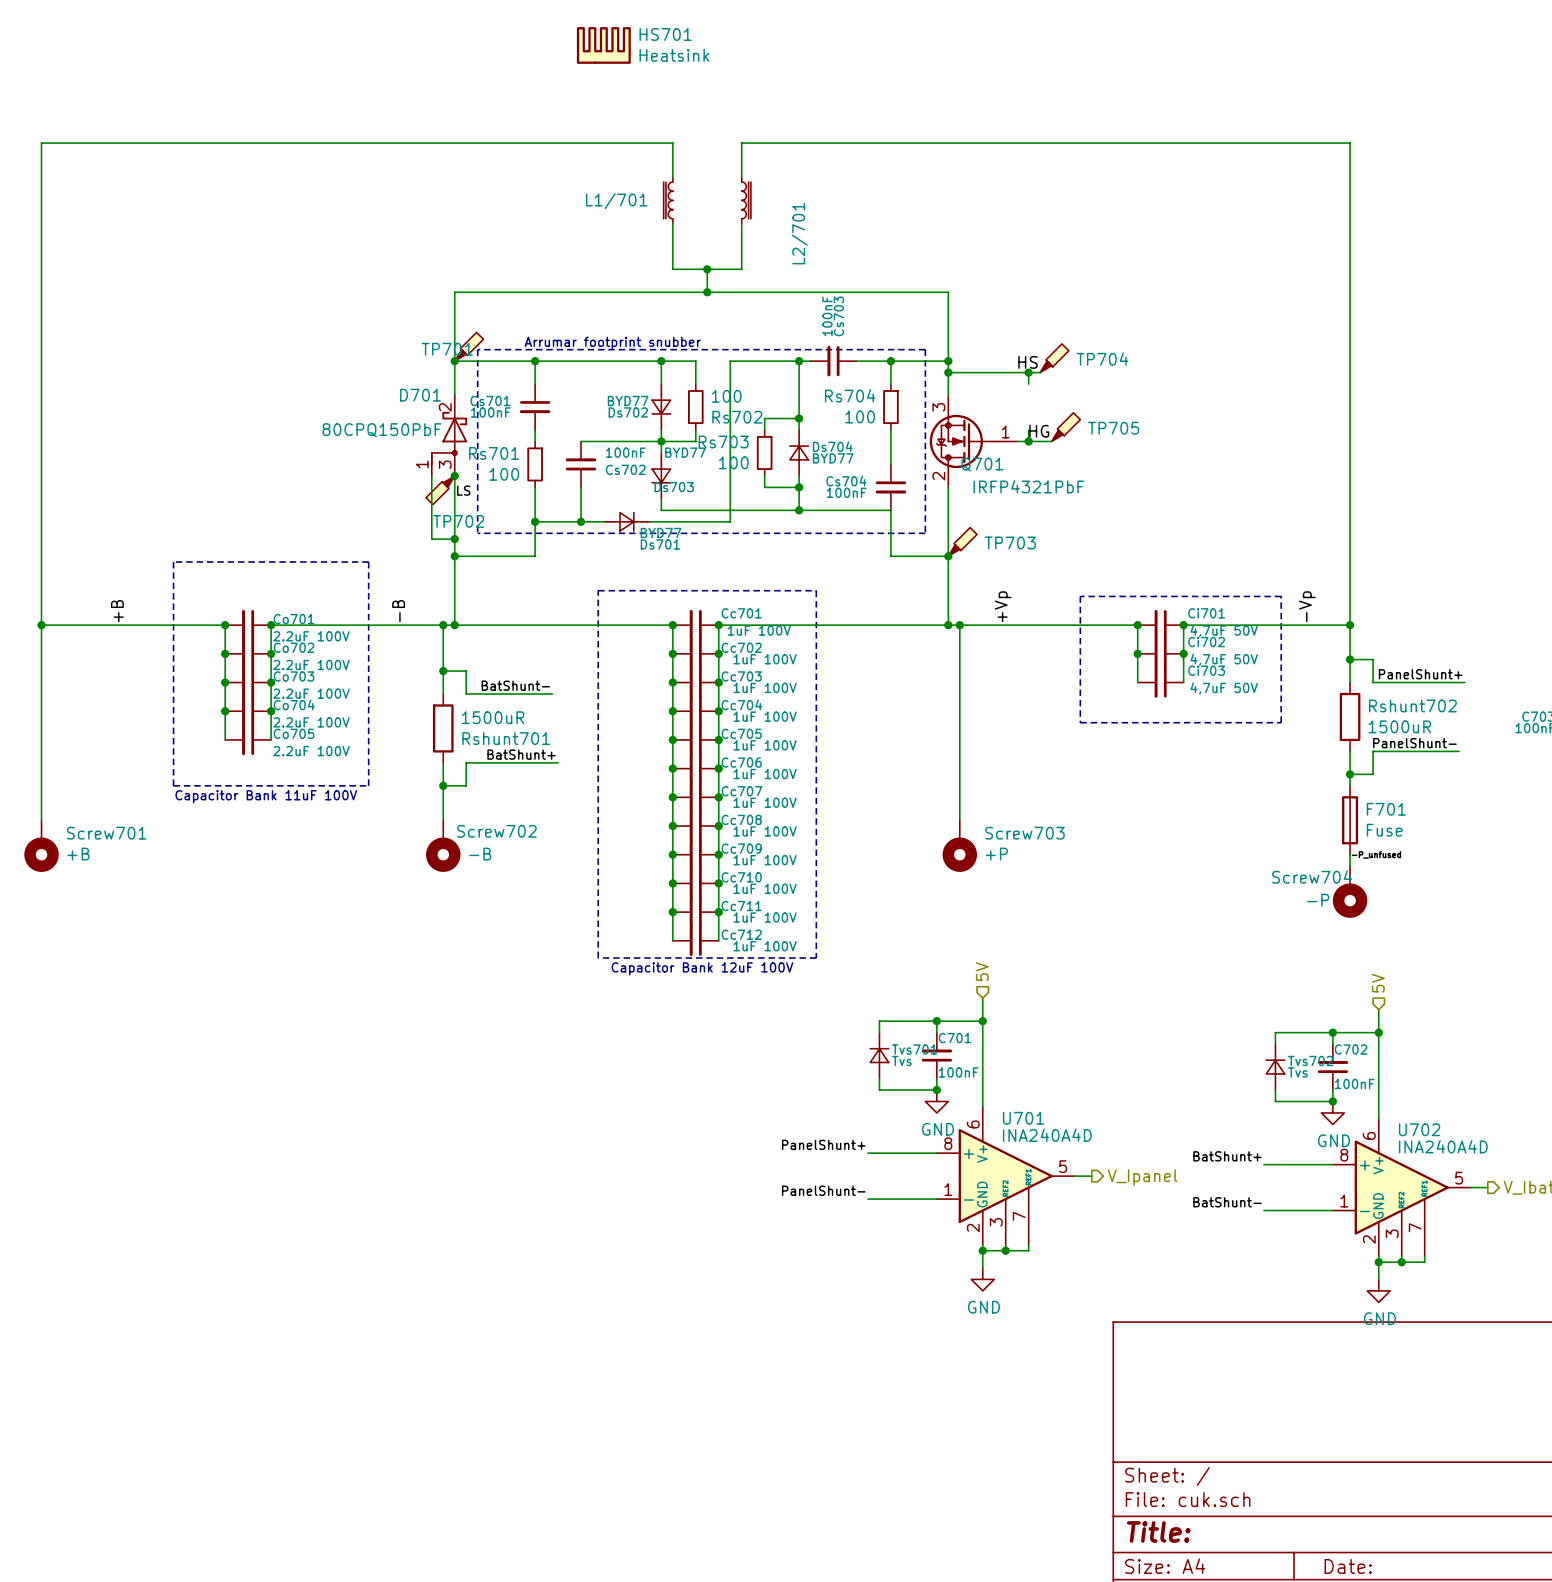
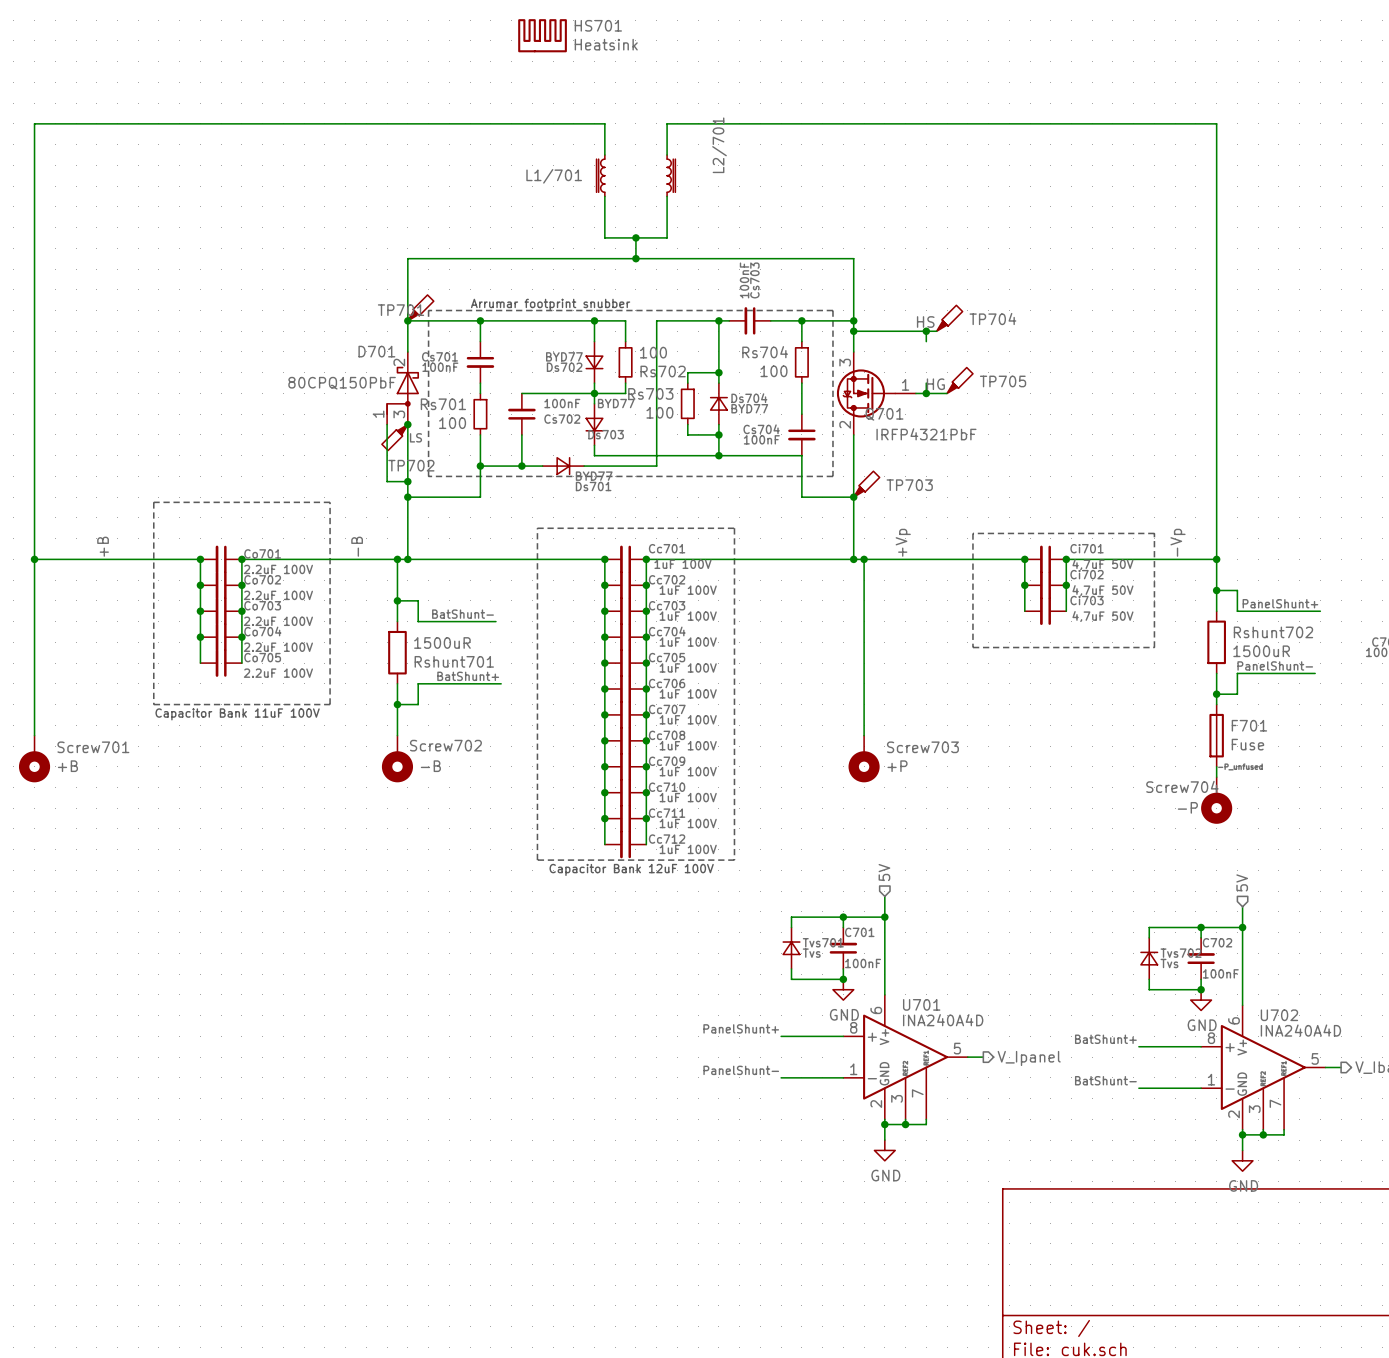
L2/701 name position: L2/701 (799, 233) -> L2/701 (719, 145)

